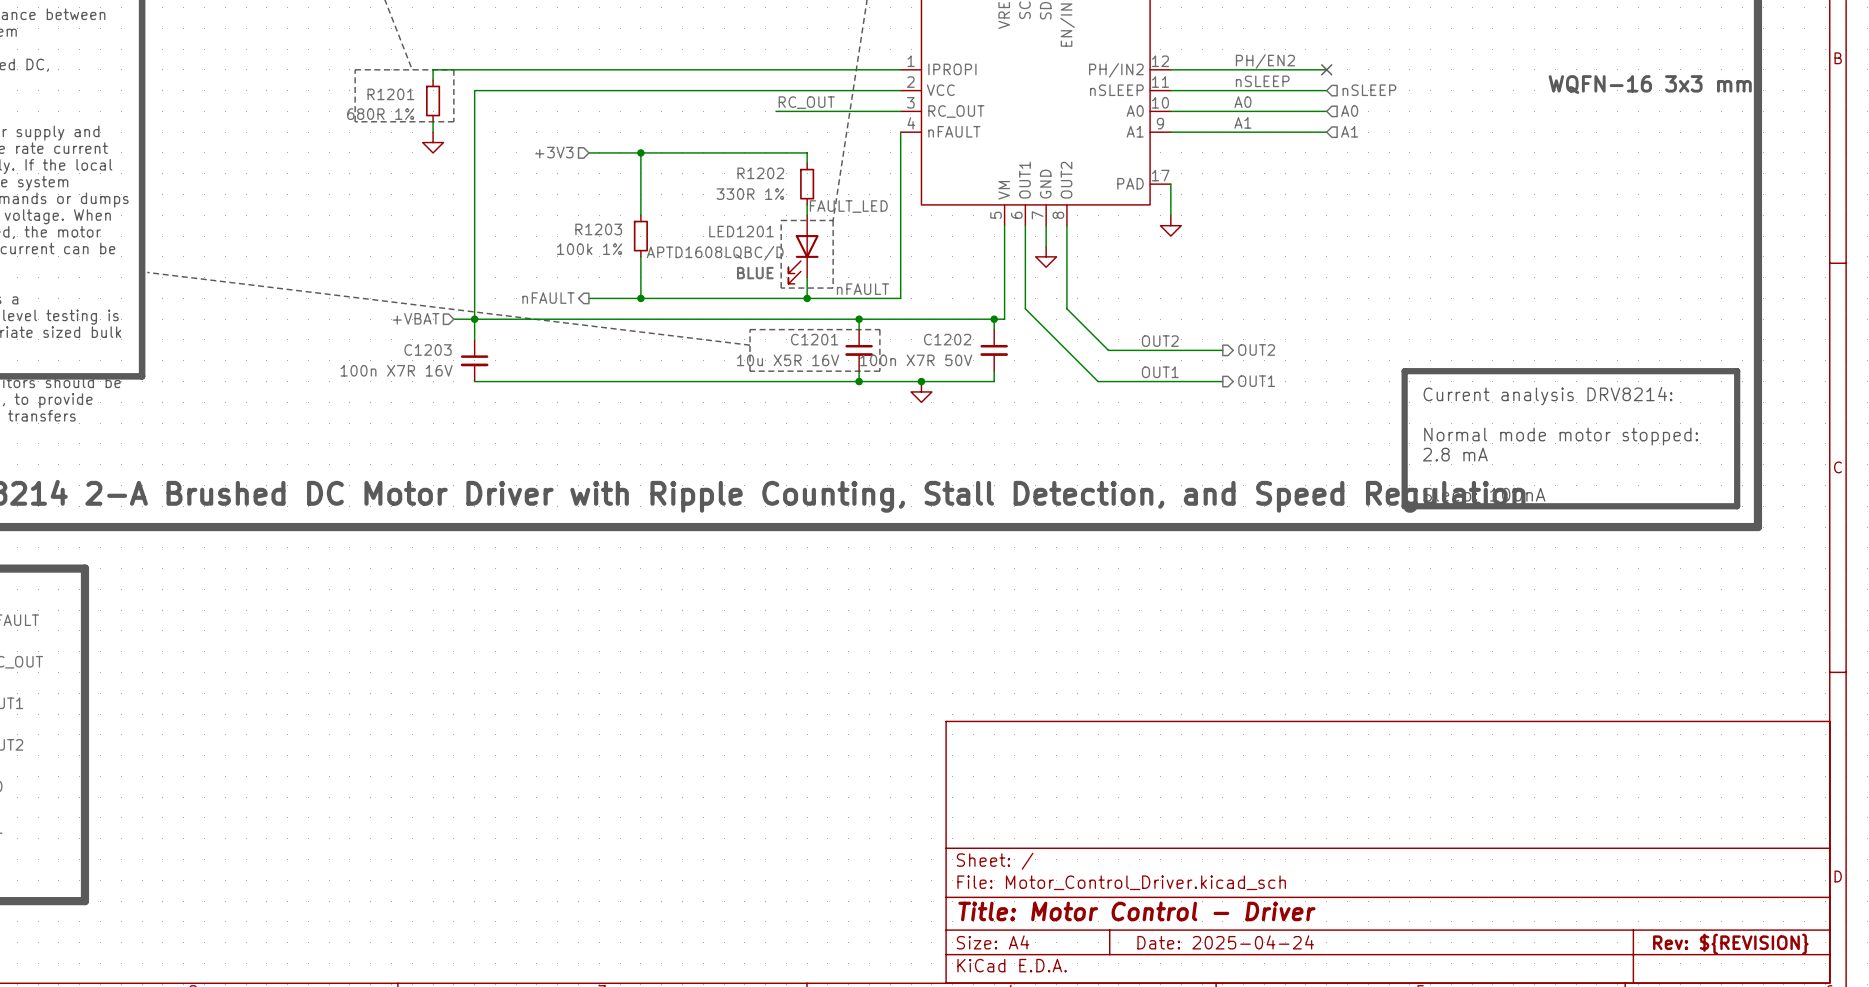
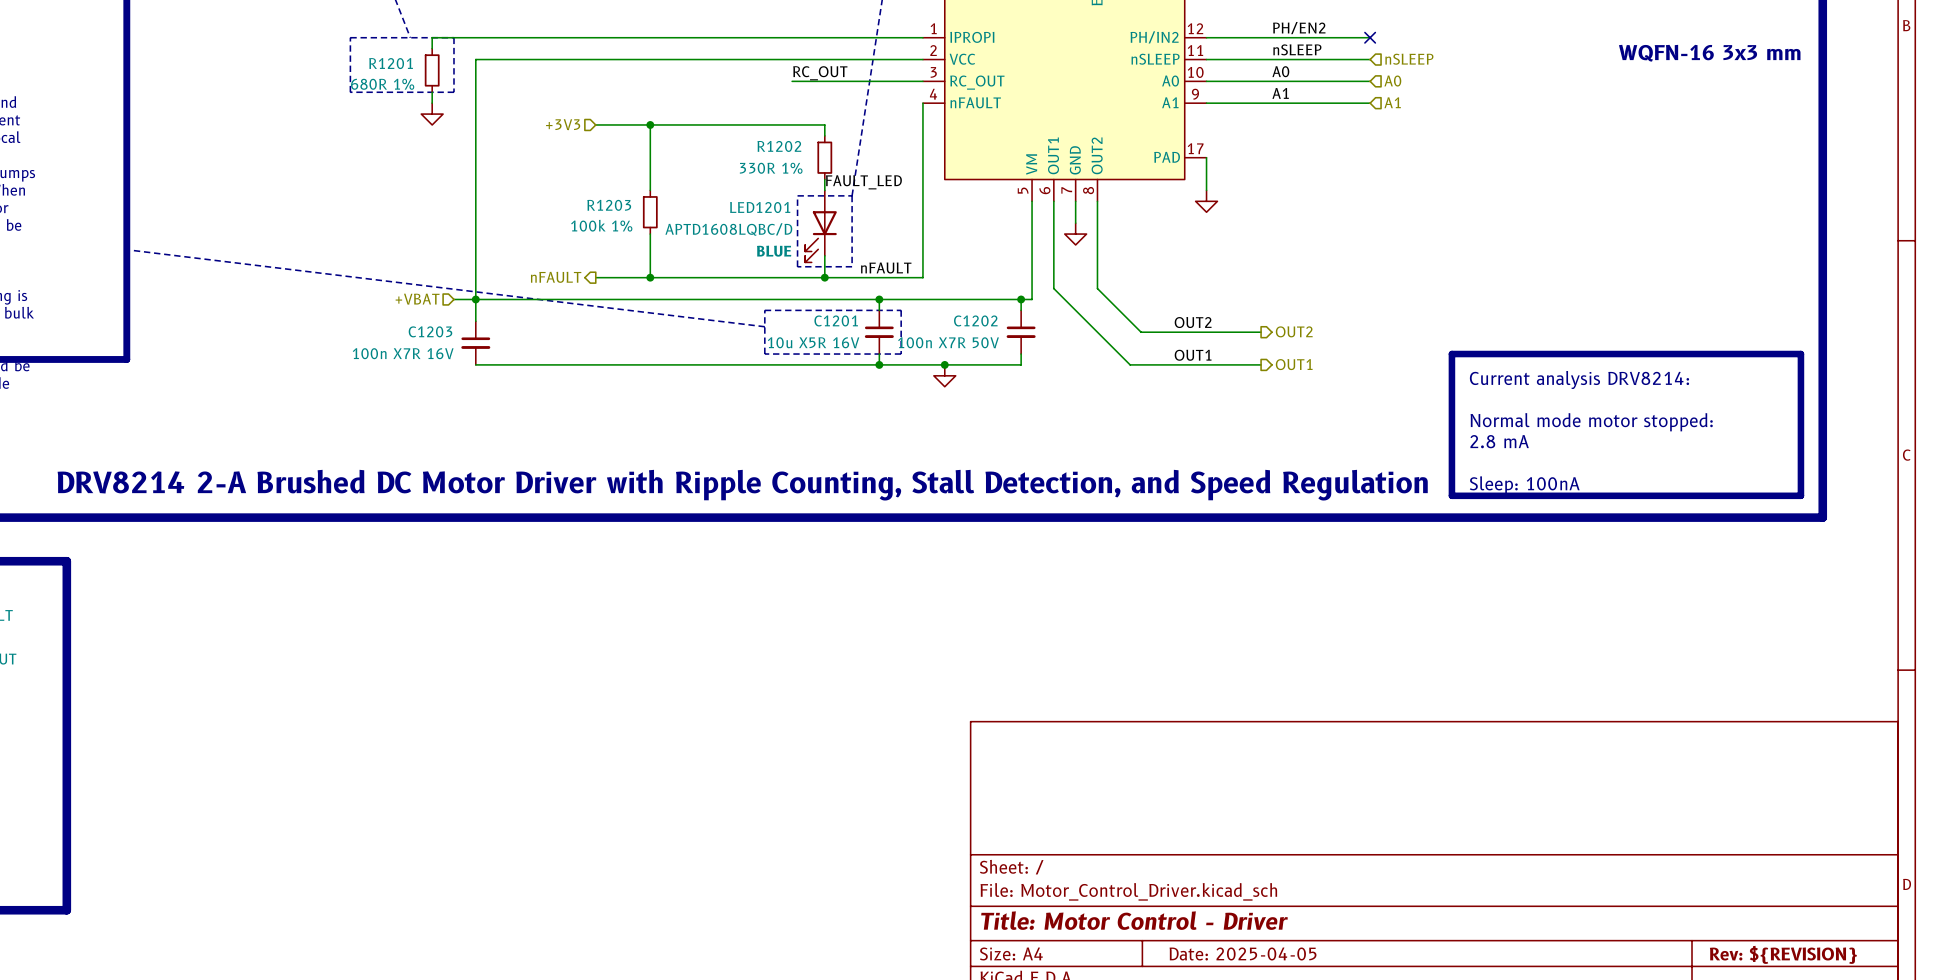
title block: Date: 2025-04-24 (1225, 942) -> Date: 2025-04-05 (1243, 953)

